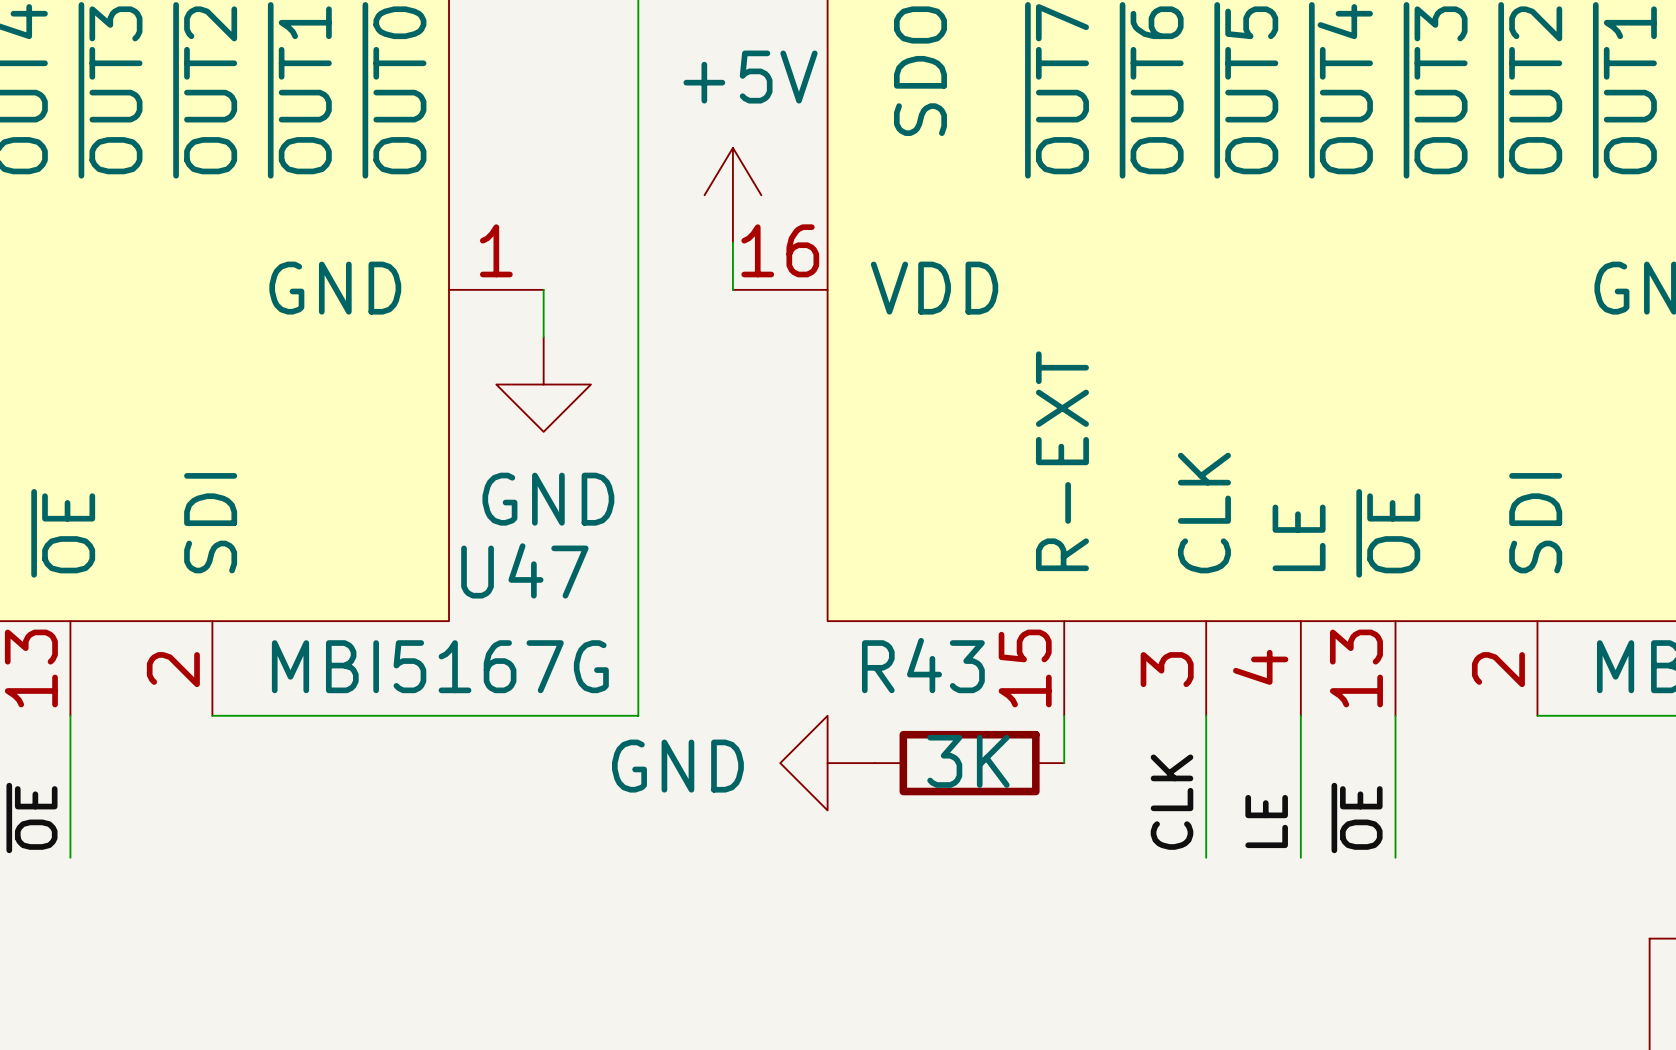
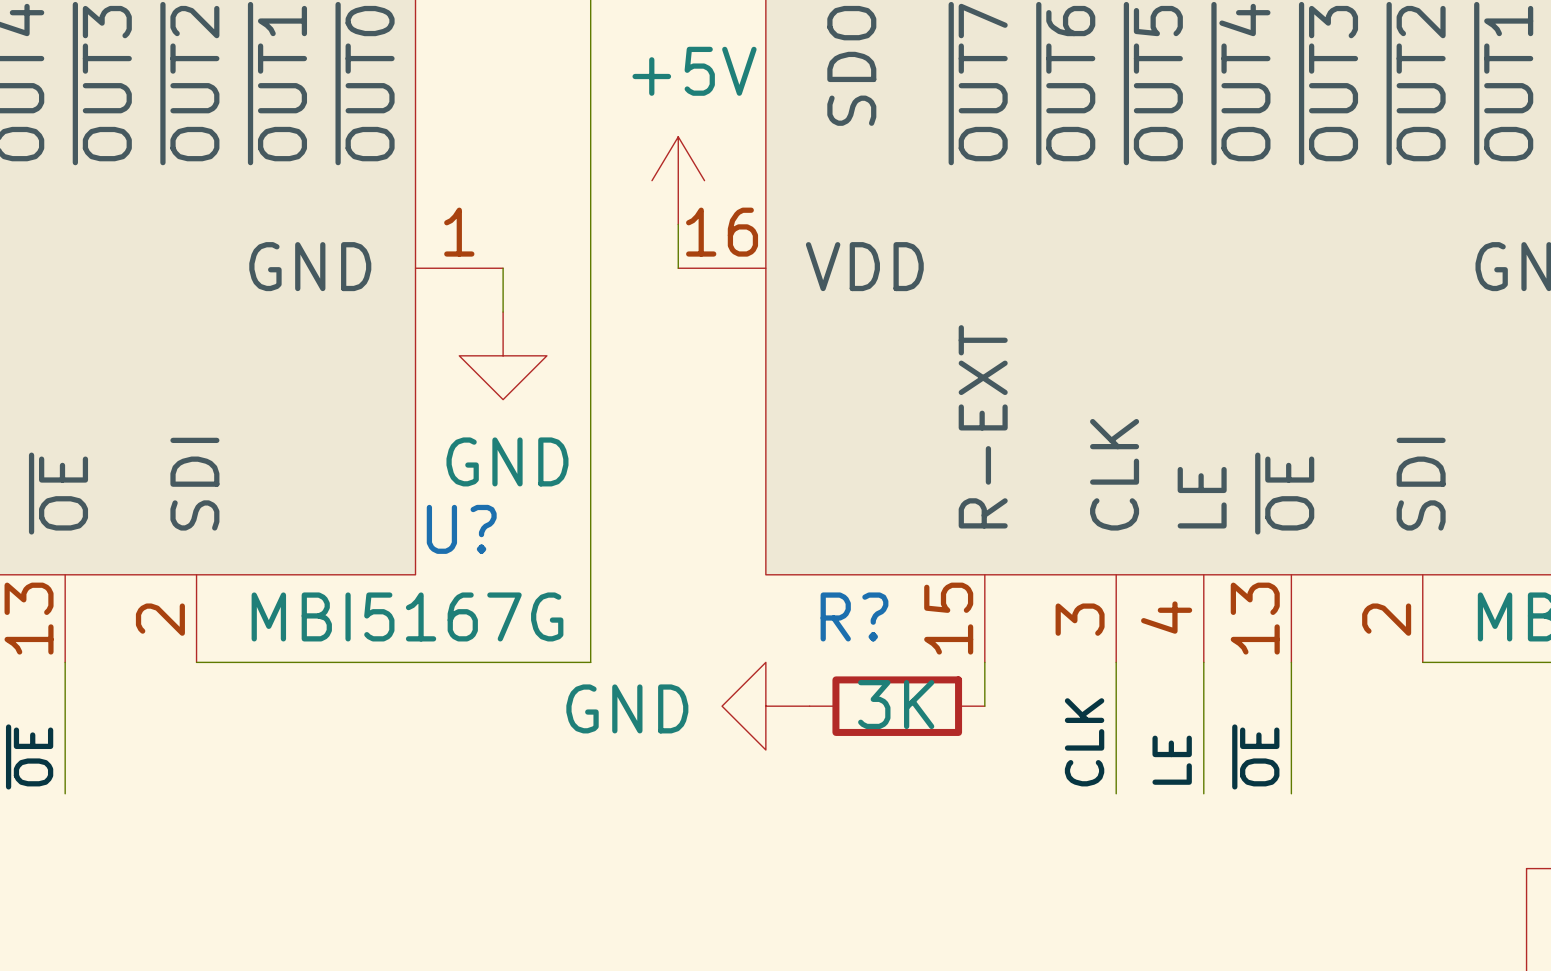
U47 name: U47 (524, 570) -> U? (461, 529)
R43 name: R43 (923, 665) -> R? (854, 616)

